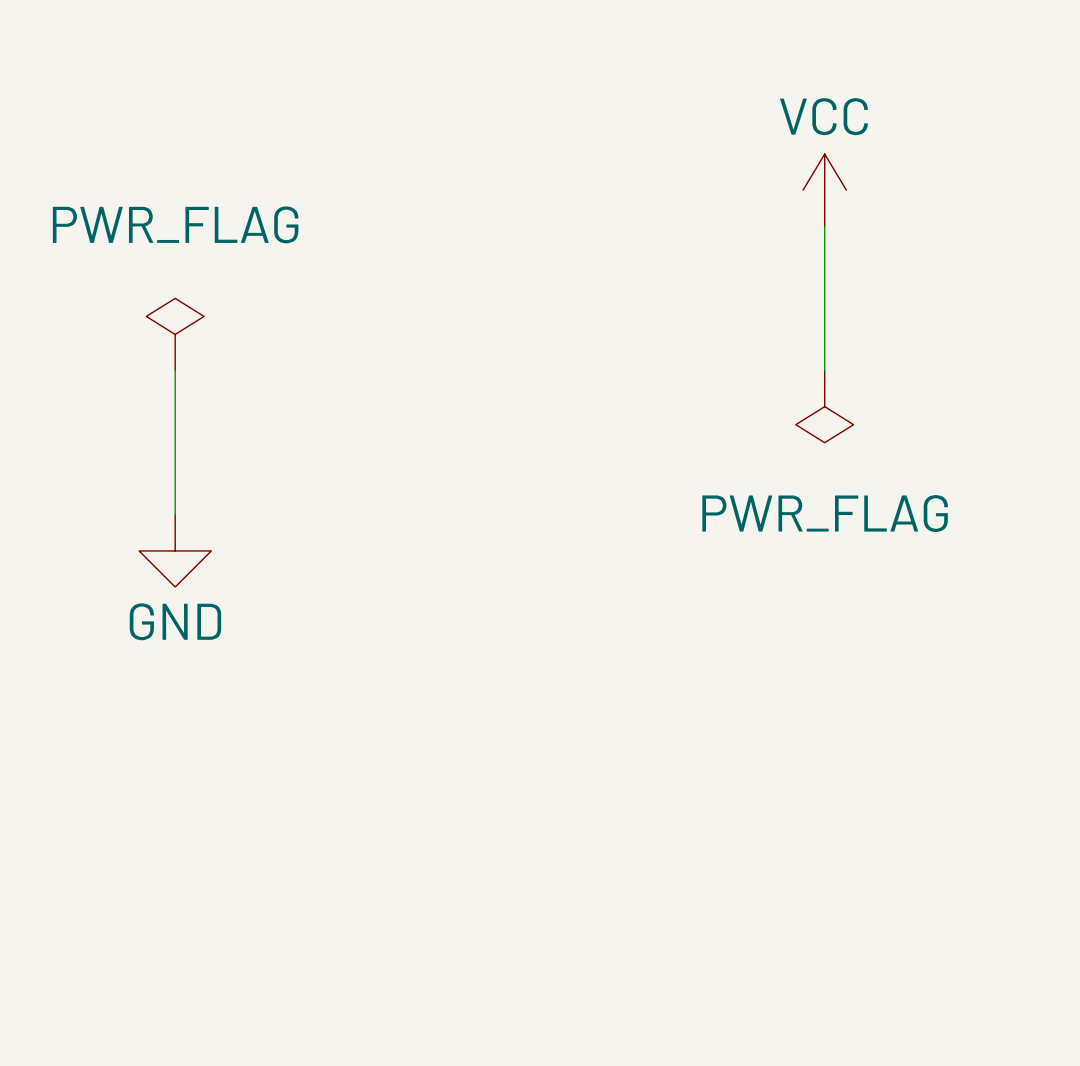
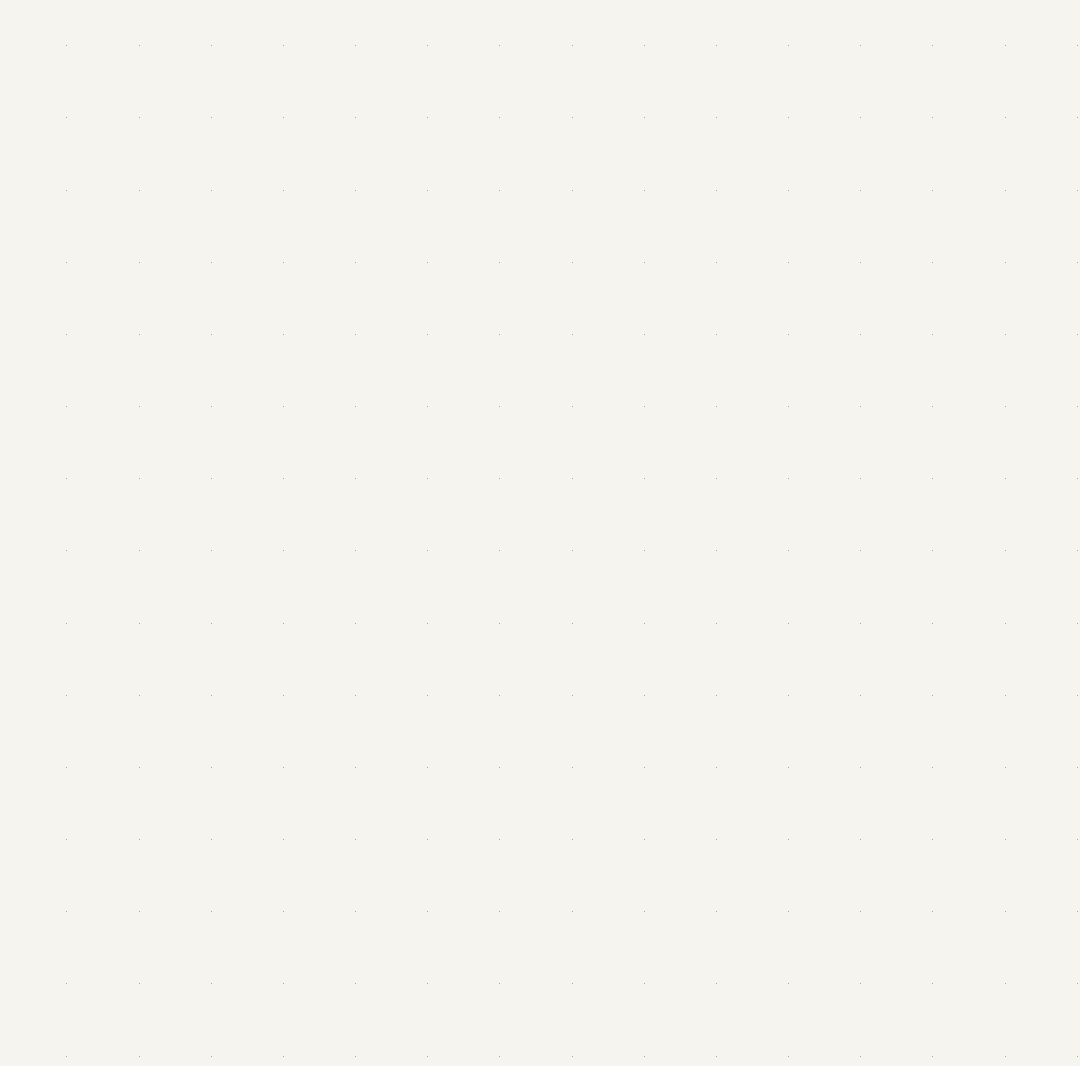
power symbol: VCC (824, 190) -> none
wire: (824, 226) (824, 370) -> none
power symbol: PWR_FLAG (175, 334) -> none
wire: (175, 370) (175, 514) -> none
power symbol: PWR_FLAG (824, 406) -> none
power symbol: GND (175, 550) -> none

